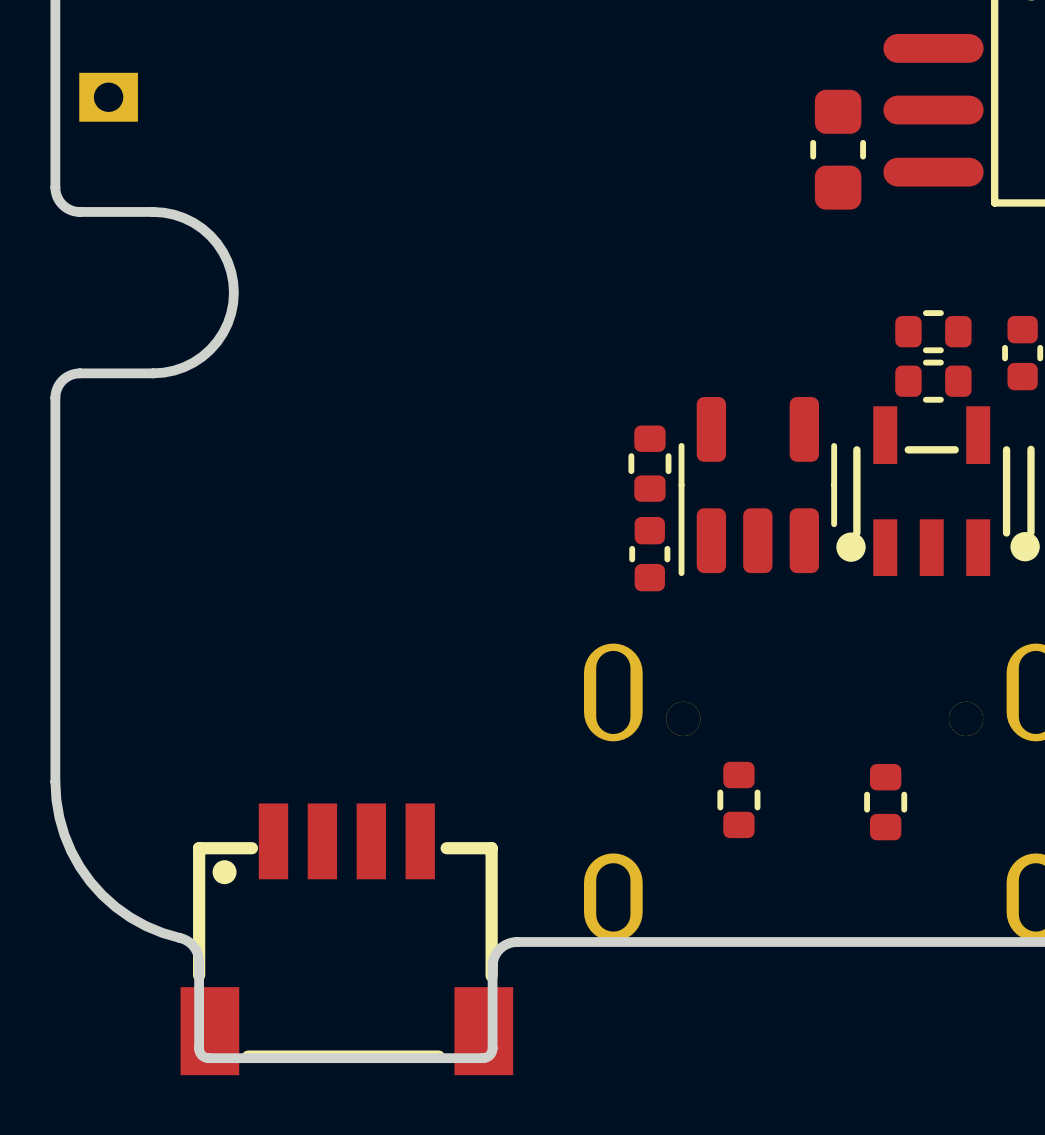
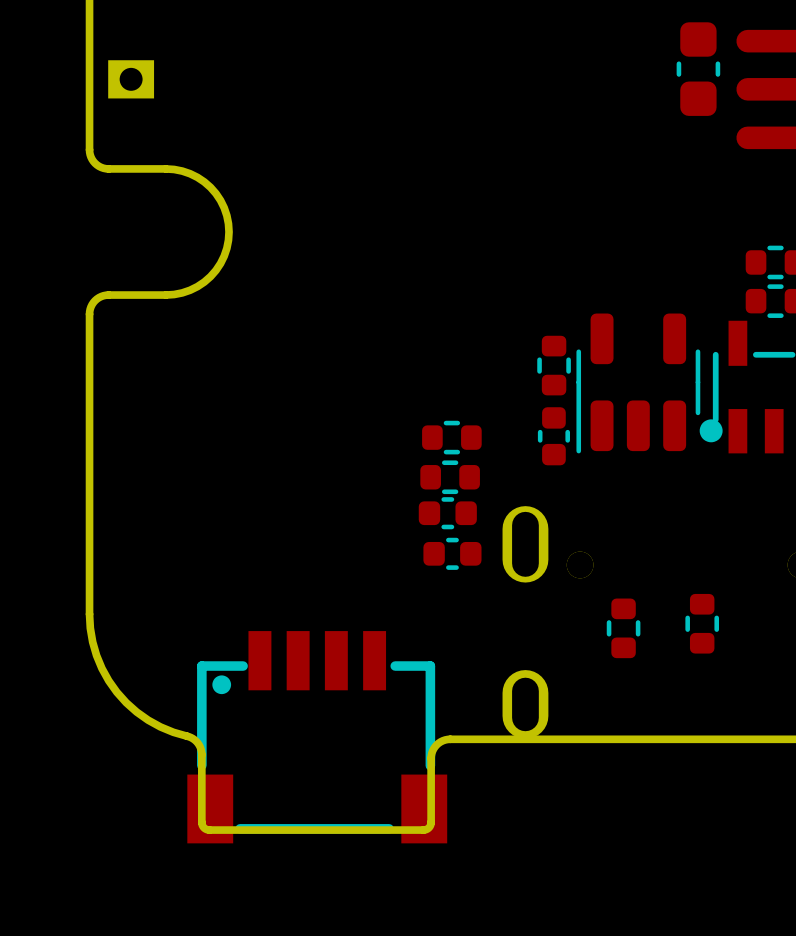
part position: (838, 149) -> (698, 69)
part: none -> (451, 437)
part: none -> (450, 477)
part: none -> (447, 513)
part: none -> (452, 553)
part position: (885, 802) -> (702, 623)

